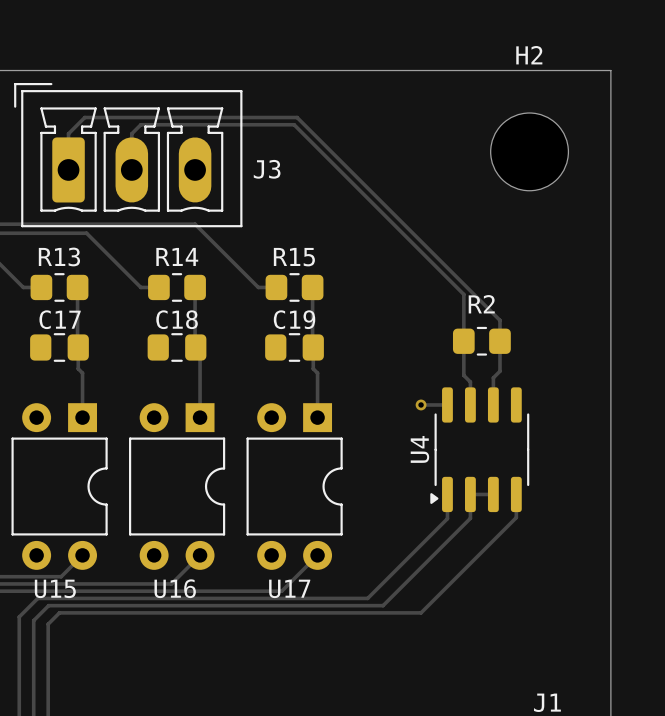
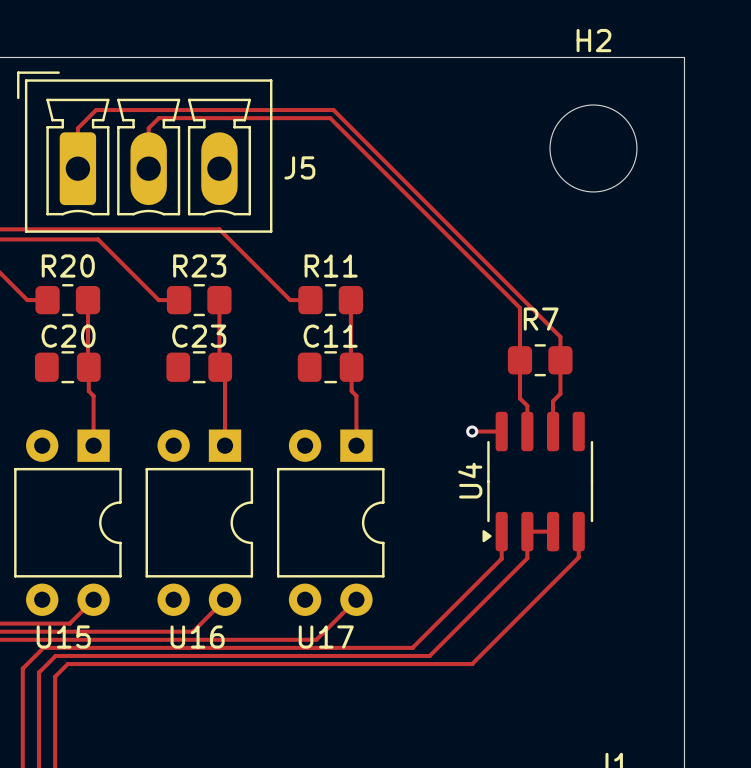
J3 name: J3 (267, 169) -> J5 (299, 167)
R13 name: R13 (59, 256) -> R20 (68, 265)
R14 name: R14 (177, 256) -> R23 (199, 265)
R15 name: R15 (294, 257) -> R11 (331, 265)
R2 name: R2 (481, 304) -> R7 (541, 319)
C17 name: C17 (60, 319) -> C20 (68, 336)
C18 name: C18 (177, 319) -> C23 (199, 336)
C19 name: C19 (294, 319) -> C11 (330, 336)

